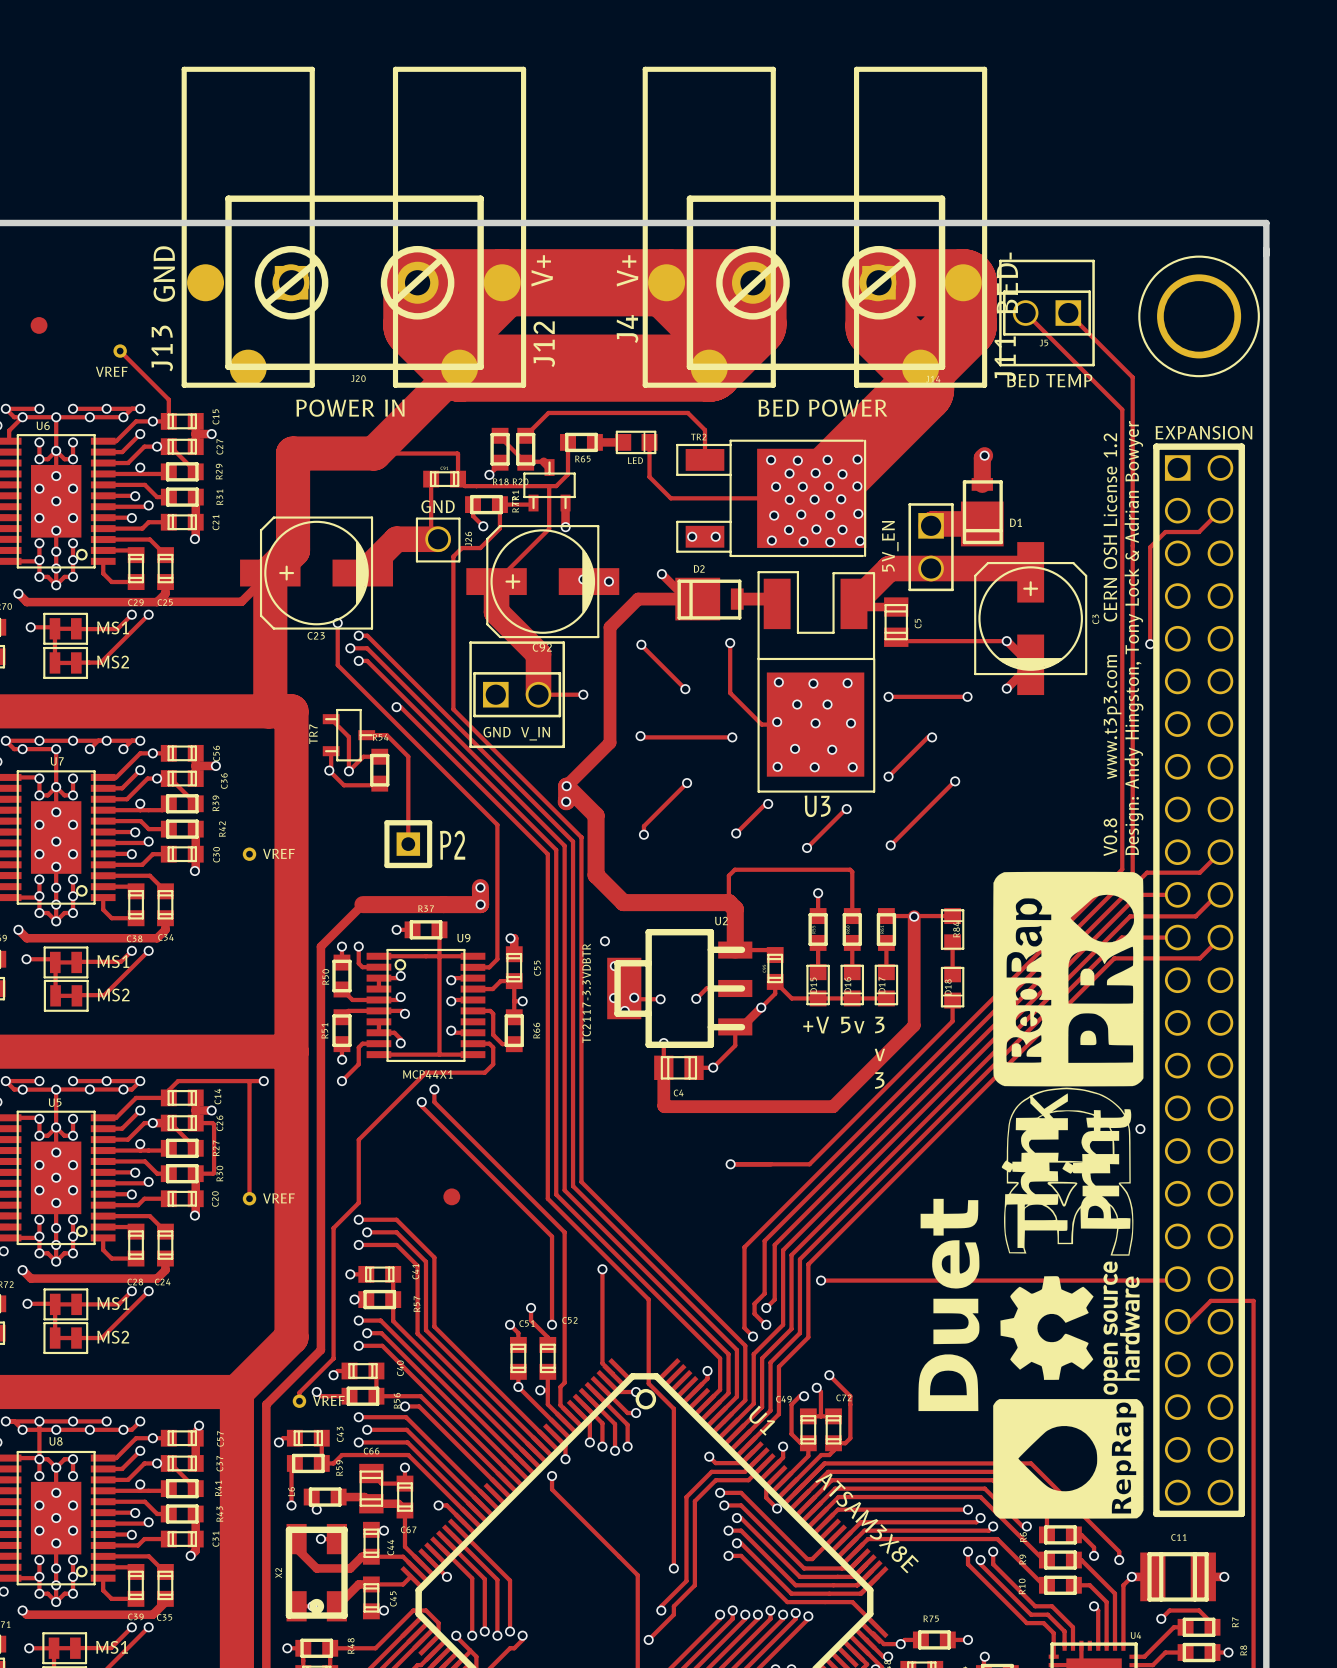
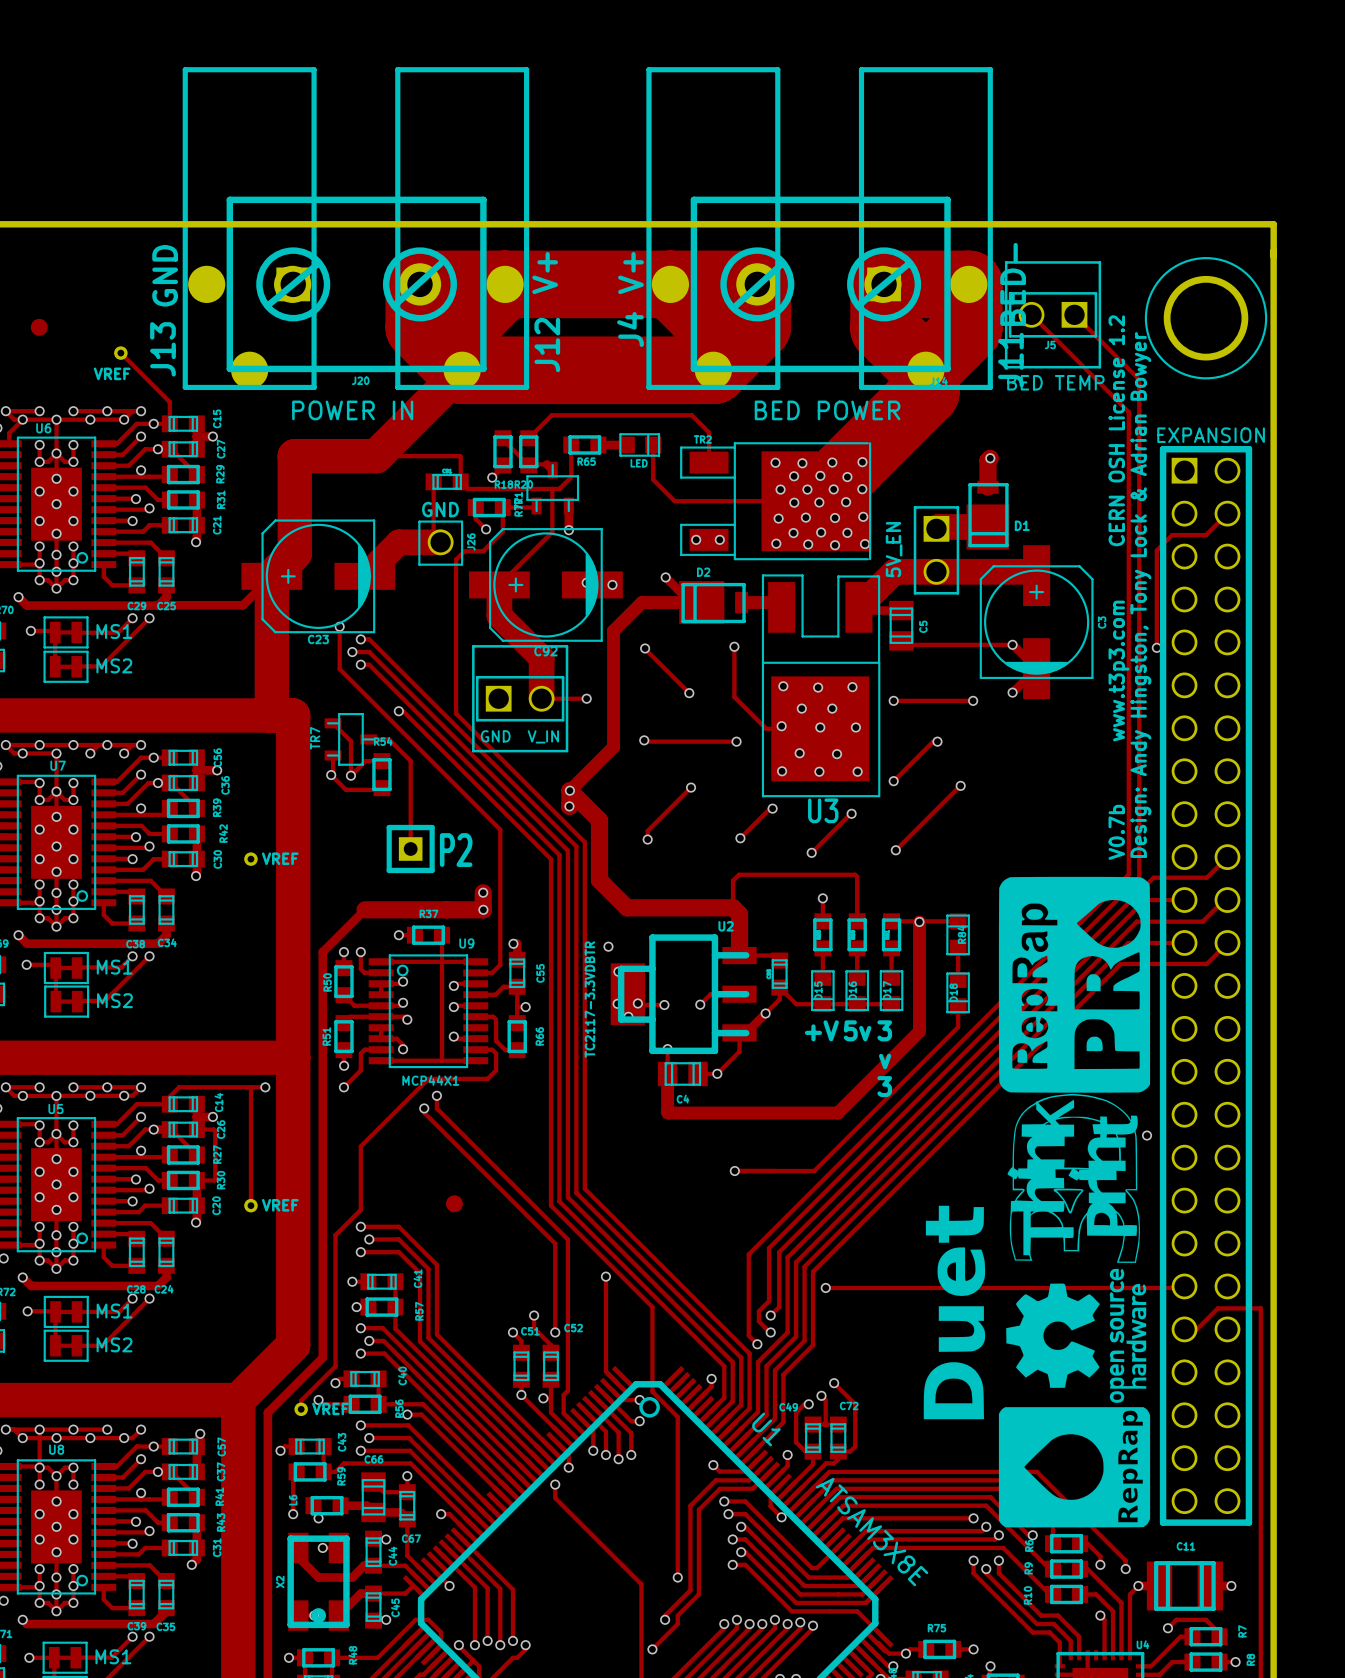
text: V0.8 www.t3p3.com CERN OSH License 1.2 (1112, 644) -> V0.7b www.t3p3.com CERN OSH License 1.2 (1119, 587)

